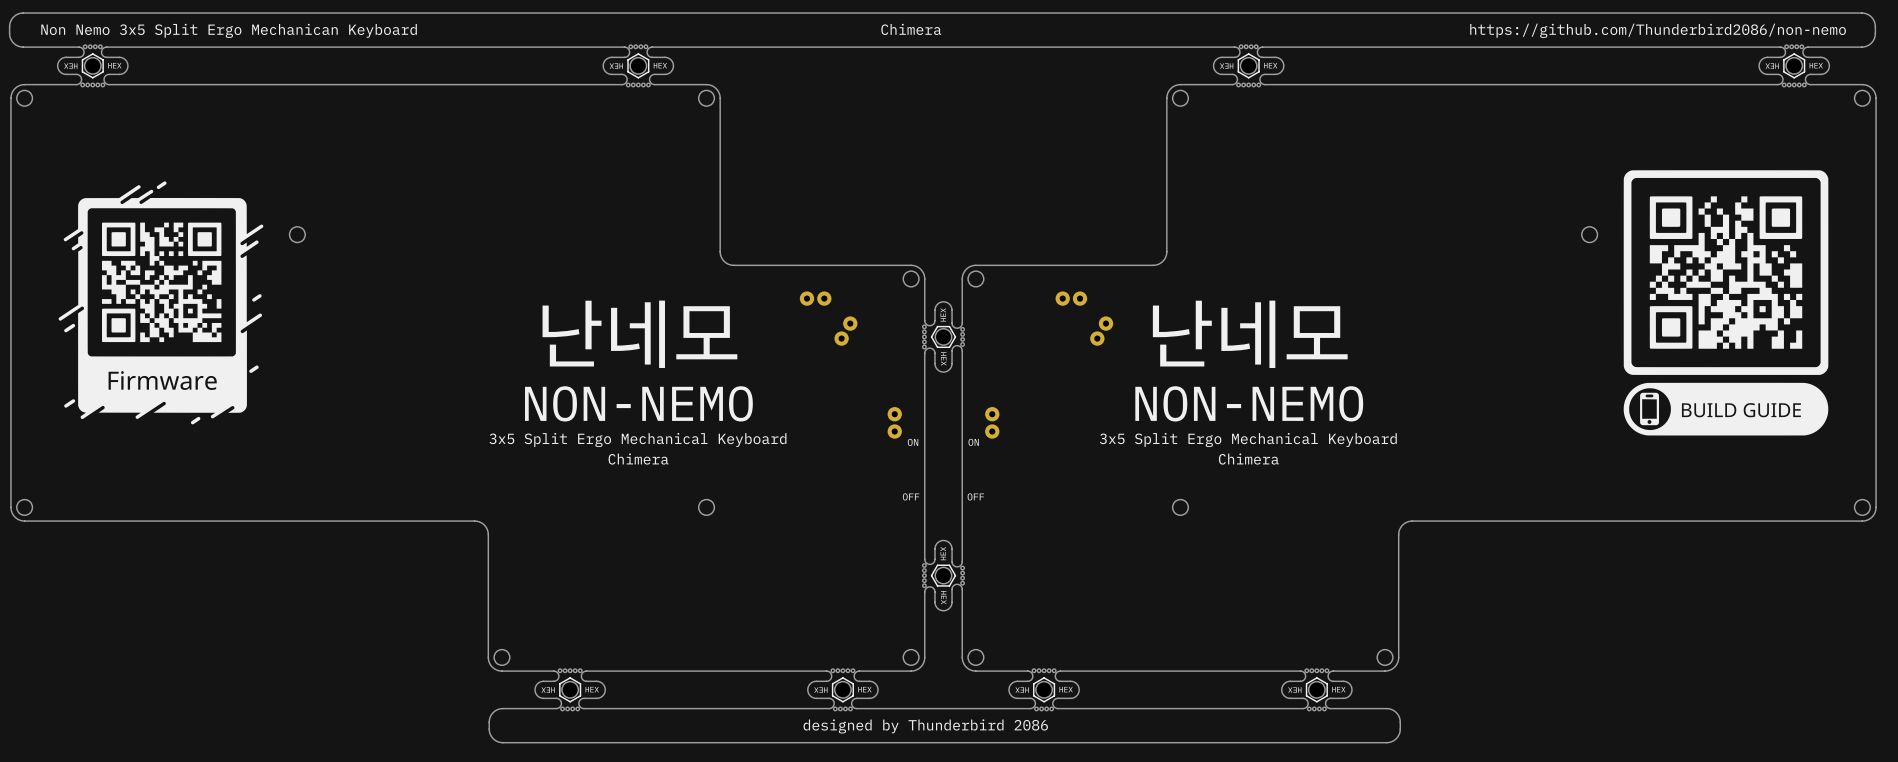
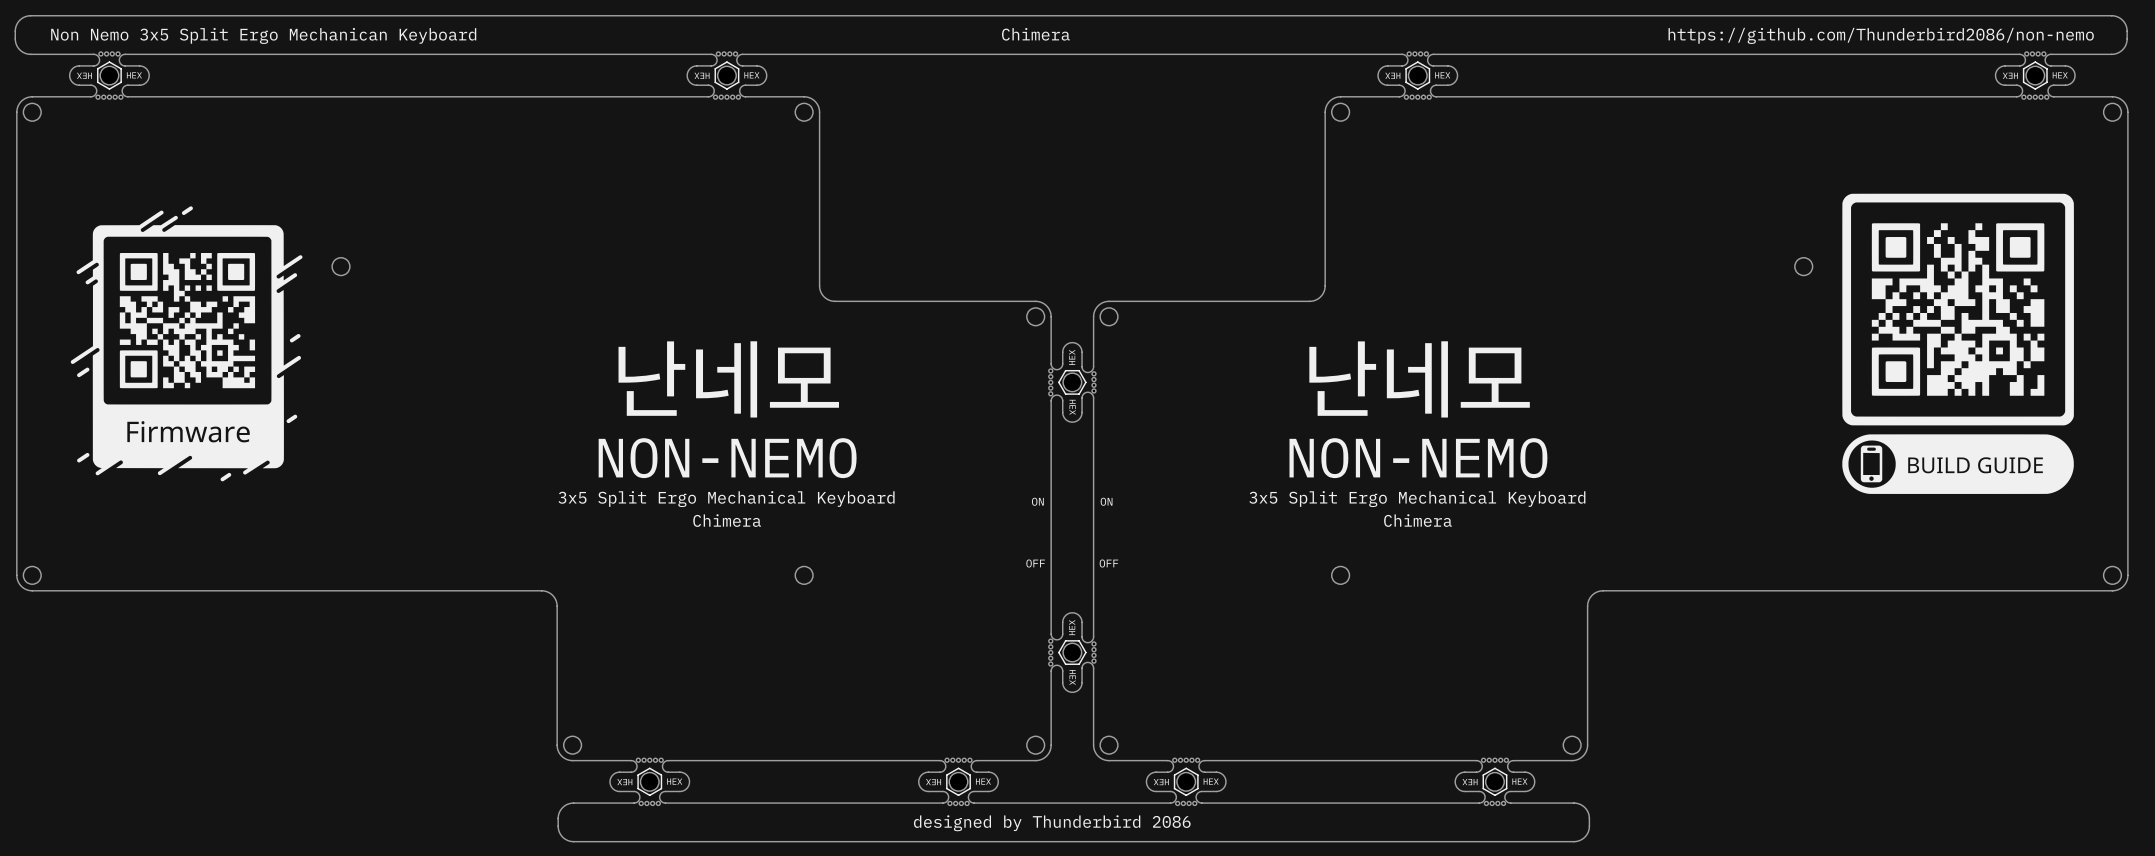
part: (815, 298) -> none
part: (1071, 298) -> none
part: (845, 331) -> none
part: (1101, 331) -> none
part: (894, 422) -> none
part: (992, 422) -> none

